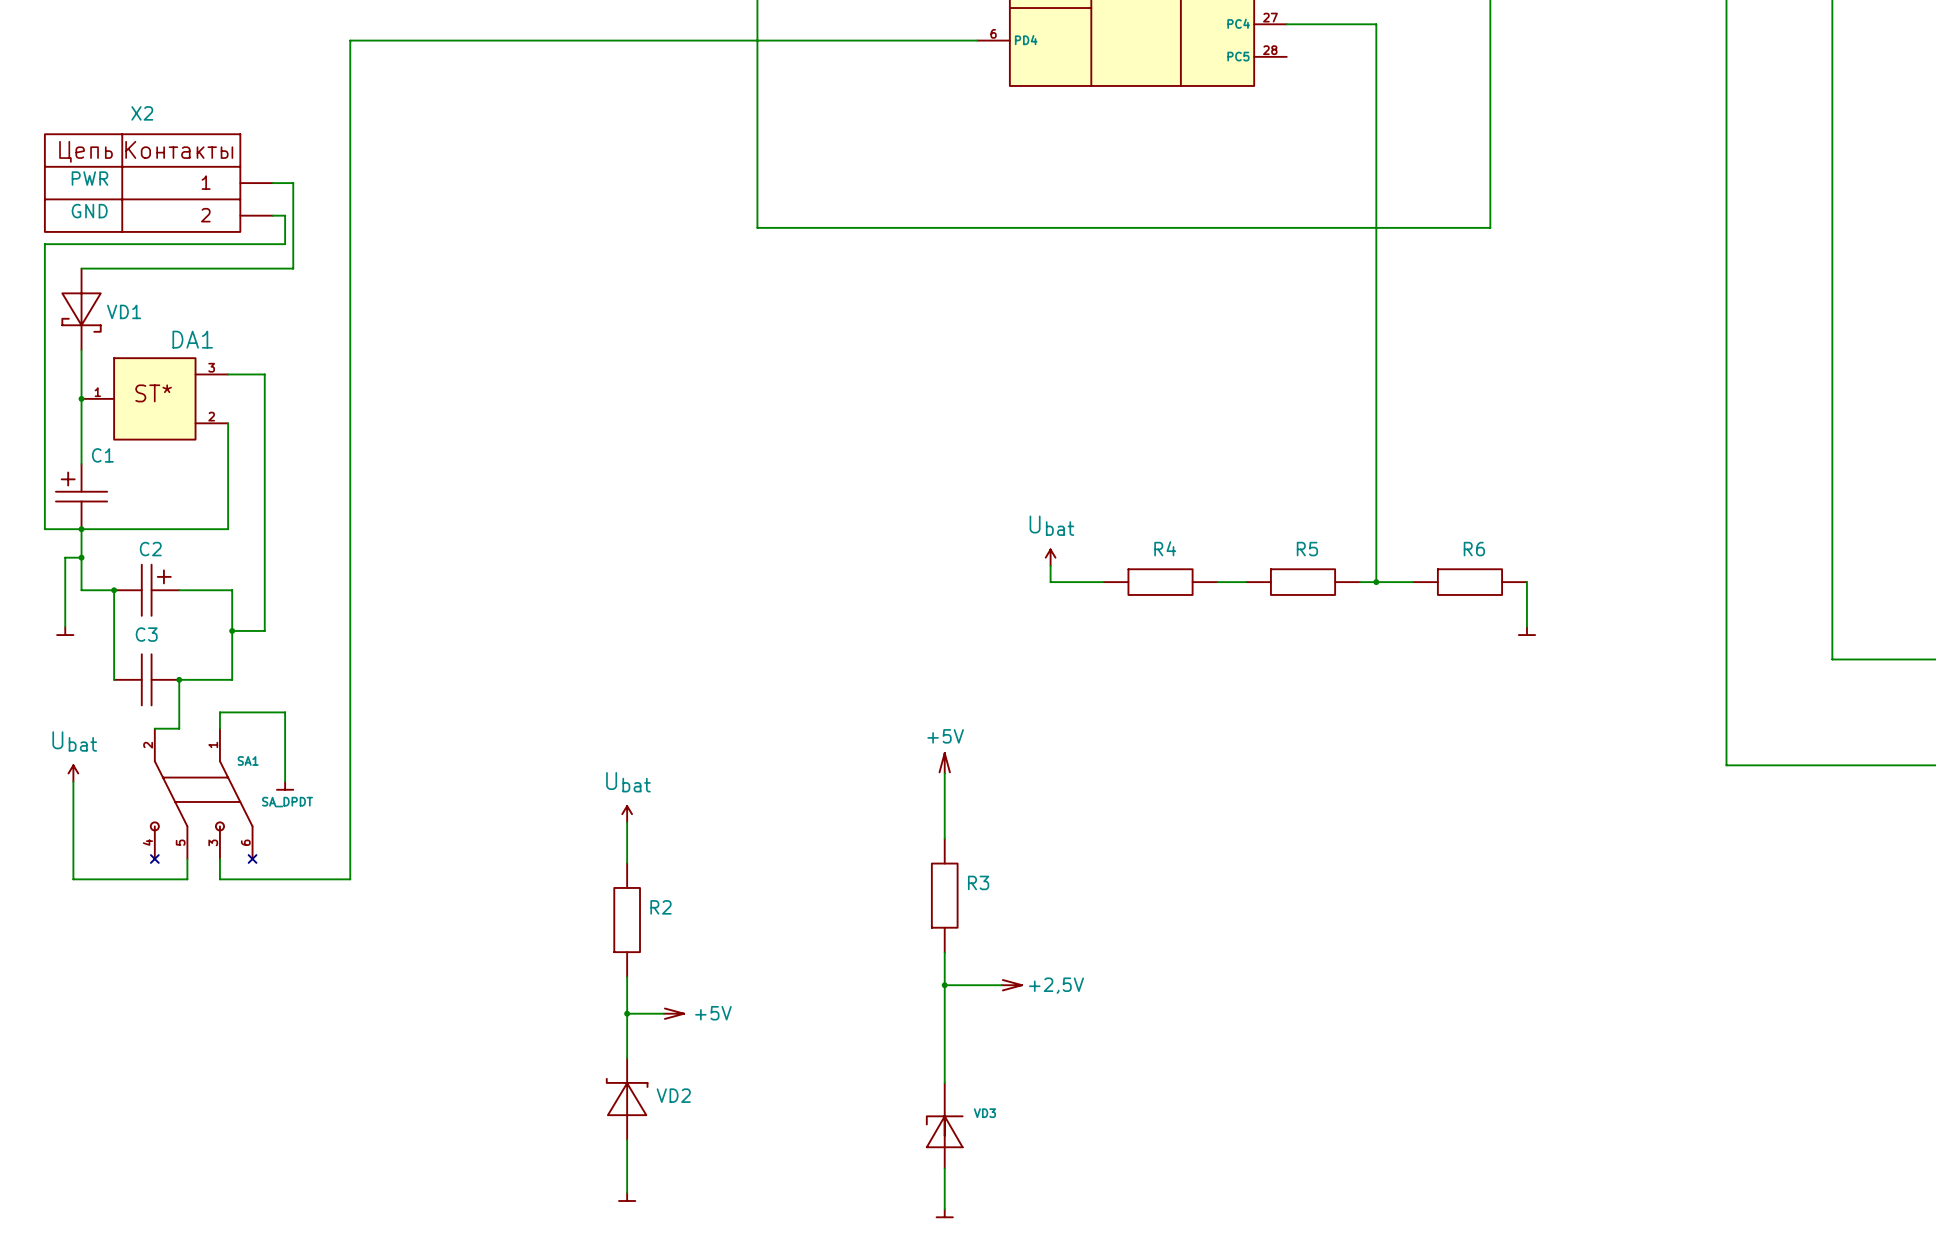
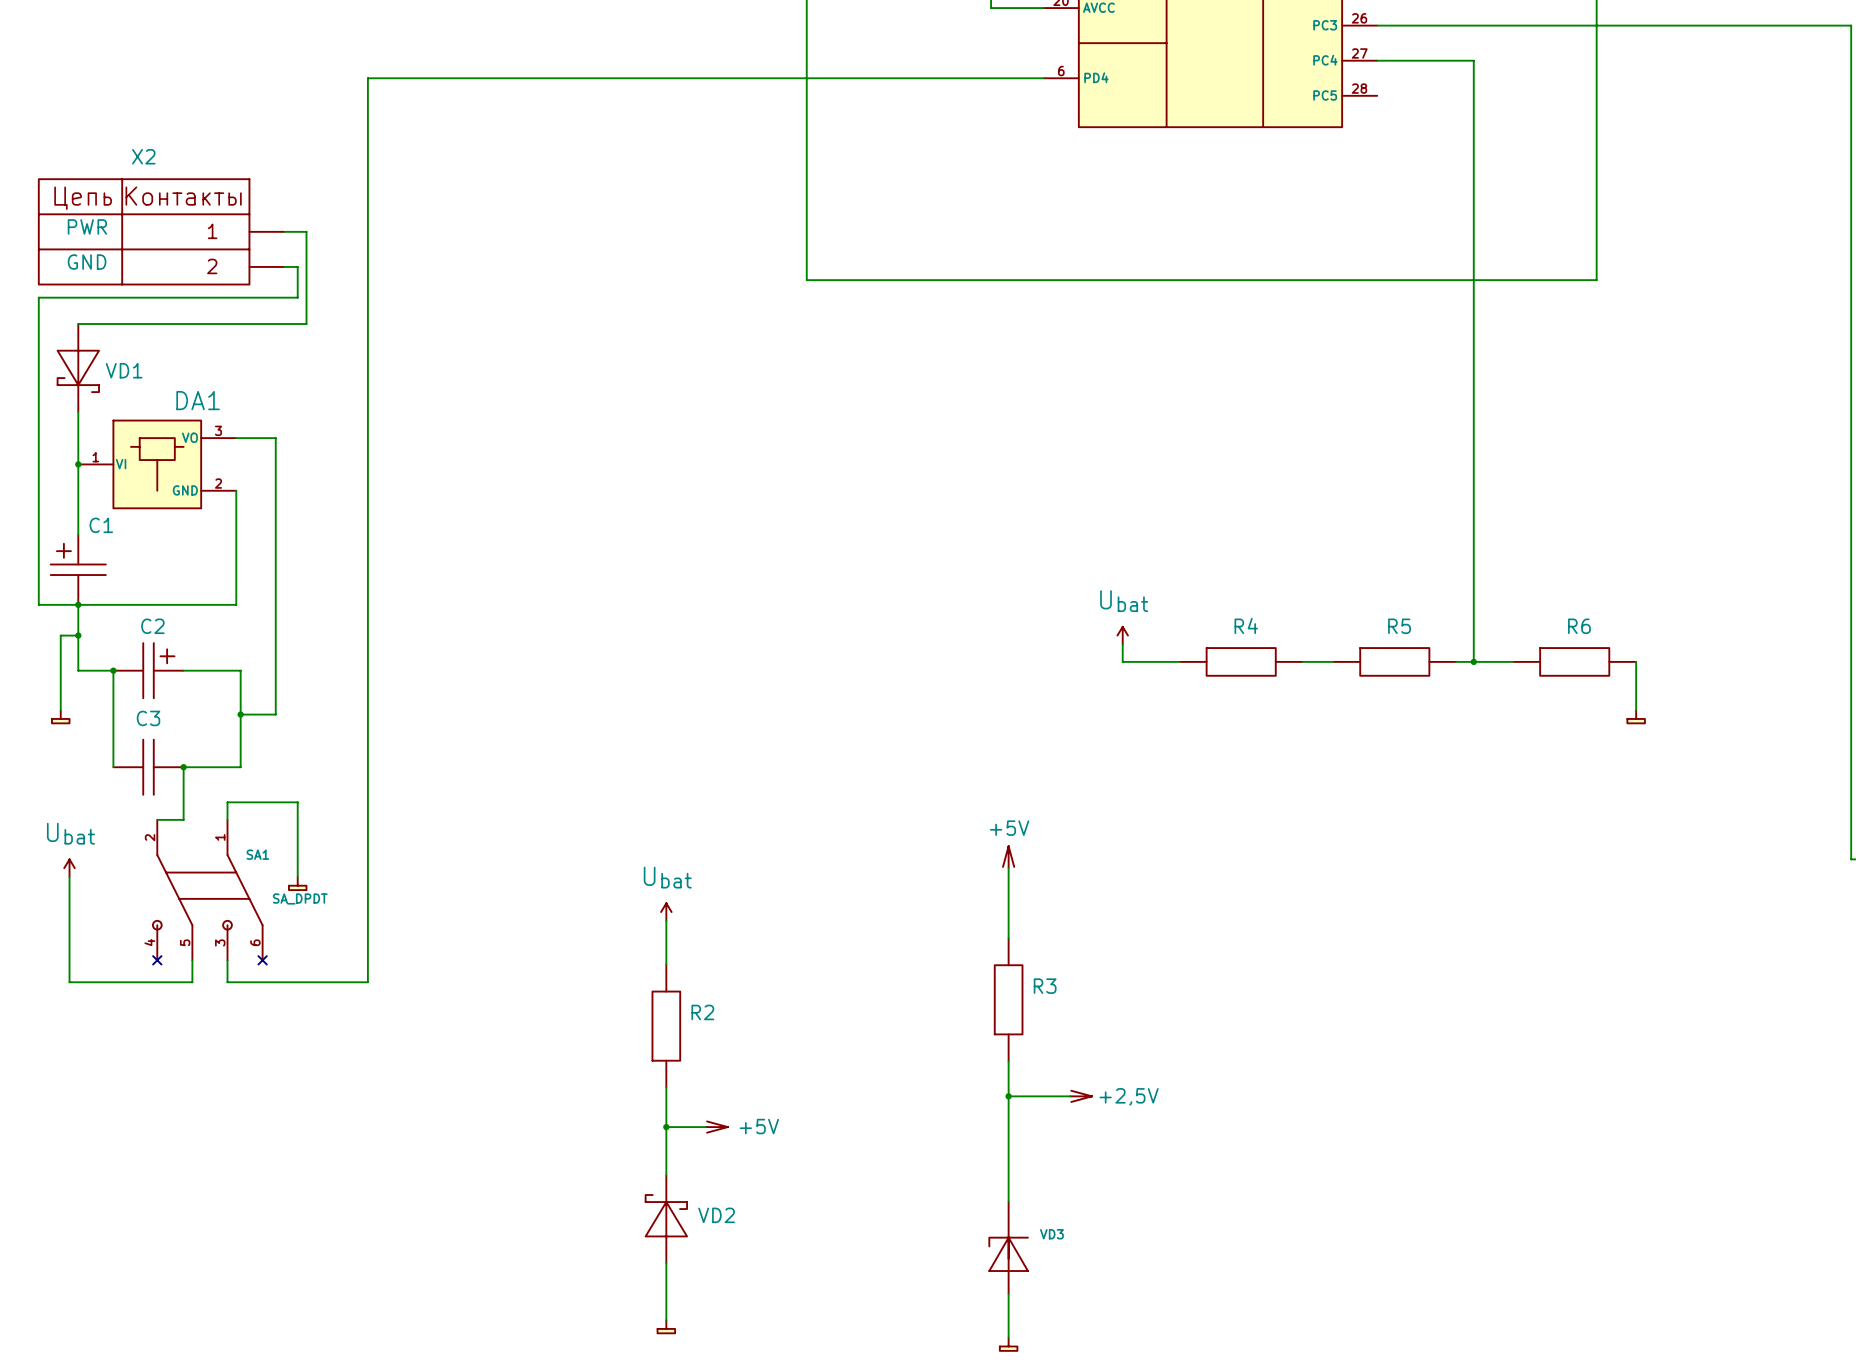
DA1 symbol: [81, 357, 229, 441] -> [78, 419, 237, 510]
power symbol shape: [57, 626, 74, 636] -> [51, 710, 70, 724]
power symbol shape: [1518, 626, 1536, 636] -> [1627, 710, 1645, 724]
power symbol shape: [276, 781, 294, 790] -> [288, 876, 307, 891]
VD2 symbol: [606, 1058, 648, 1140] -> [645, 1175, 688, 1264]
power symbol shape: [618, 1192, 636, 1202] -> [657, 1320, 676, 1334]
power symbol shape: [936, 1209, 953, 1218] -> [999, 1337, 1018, 1351]

